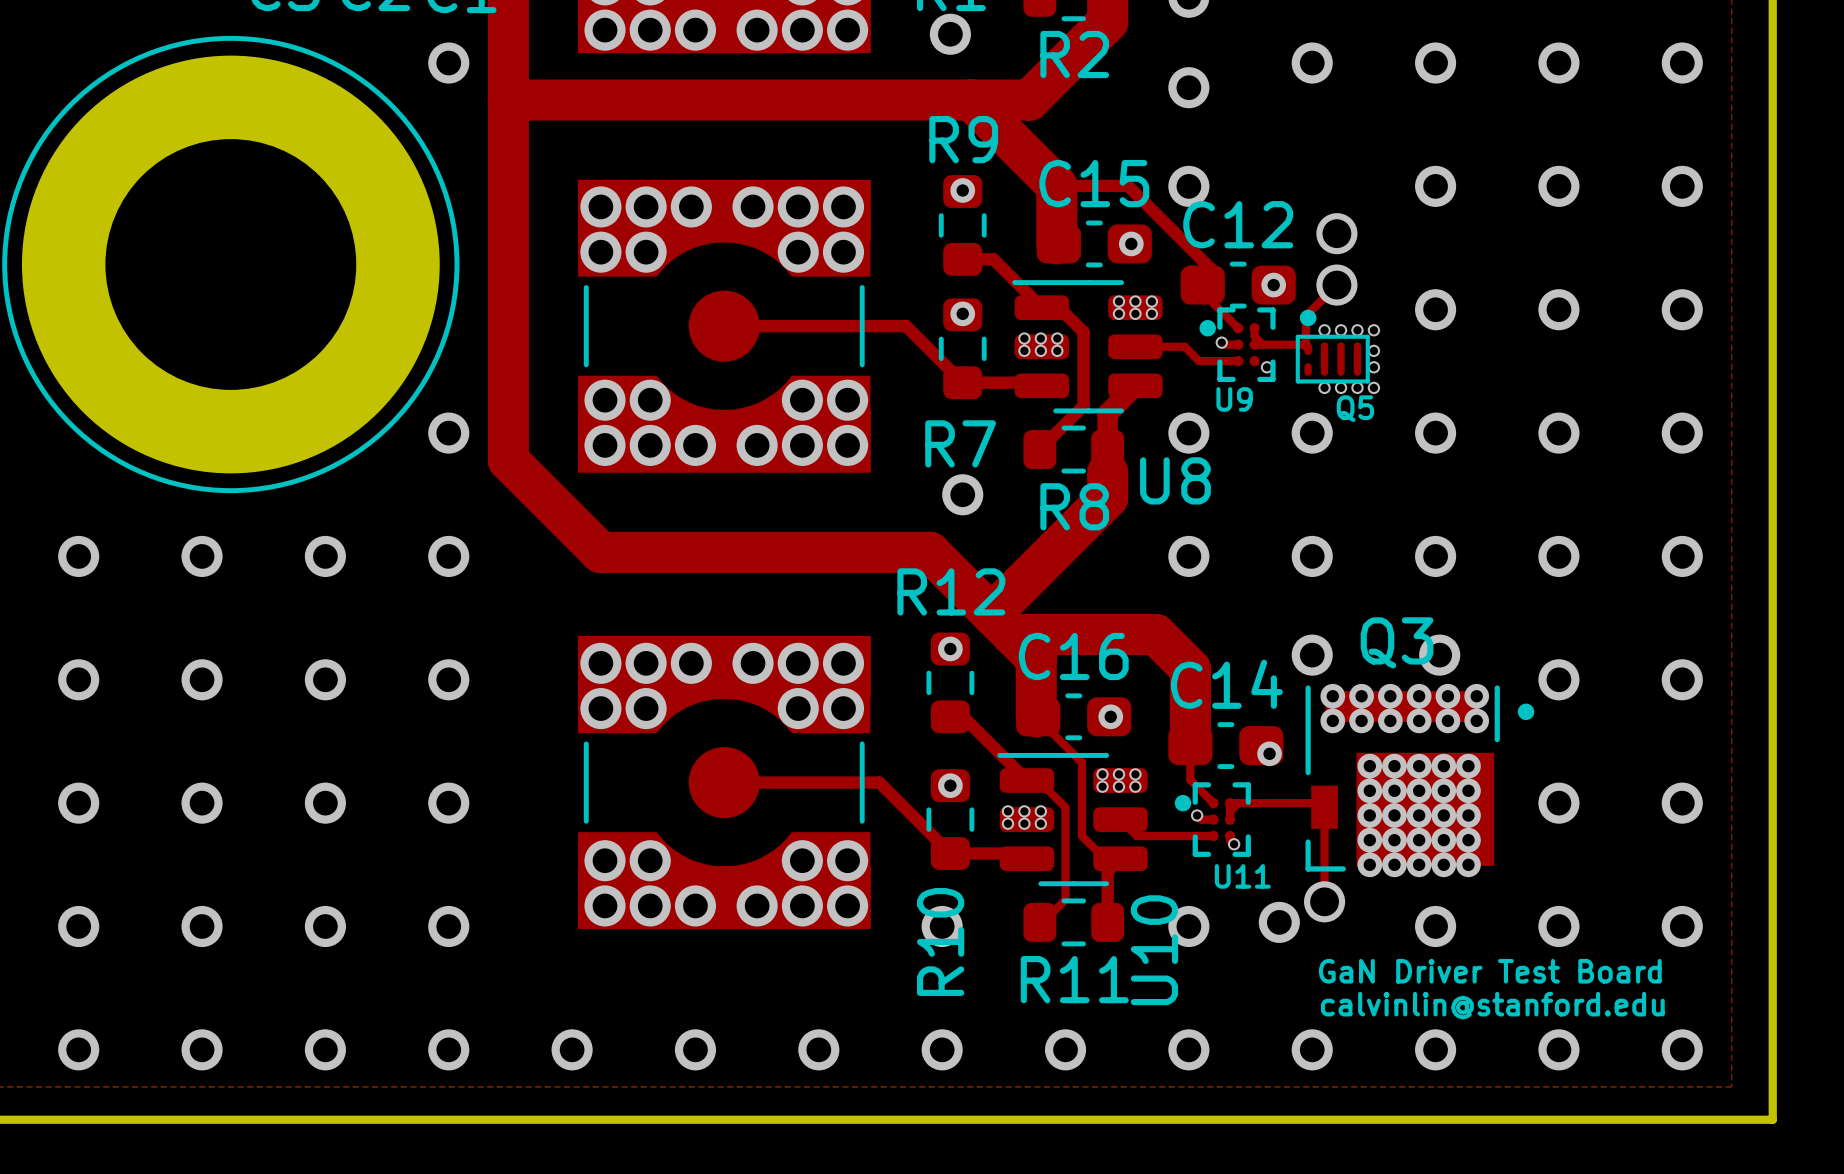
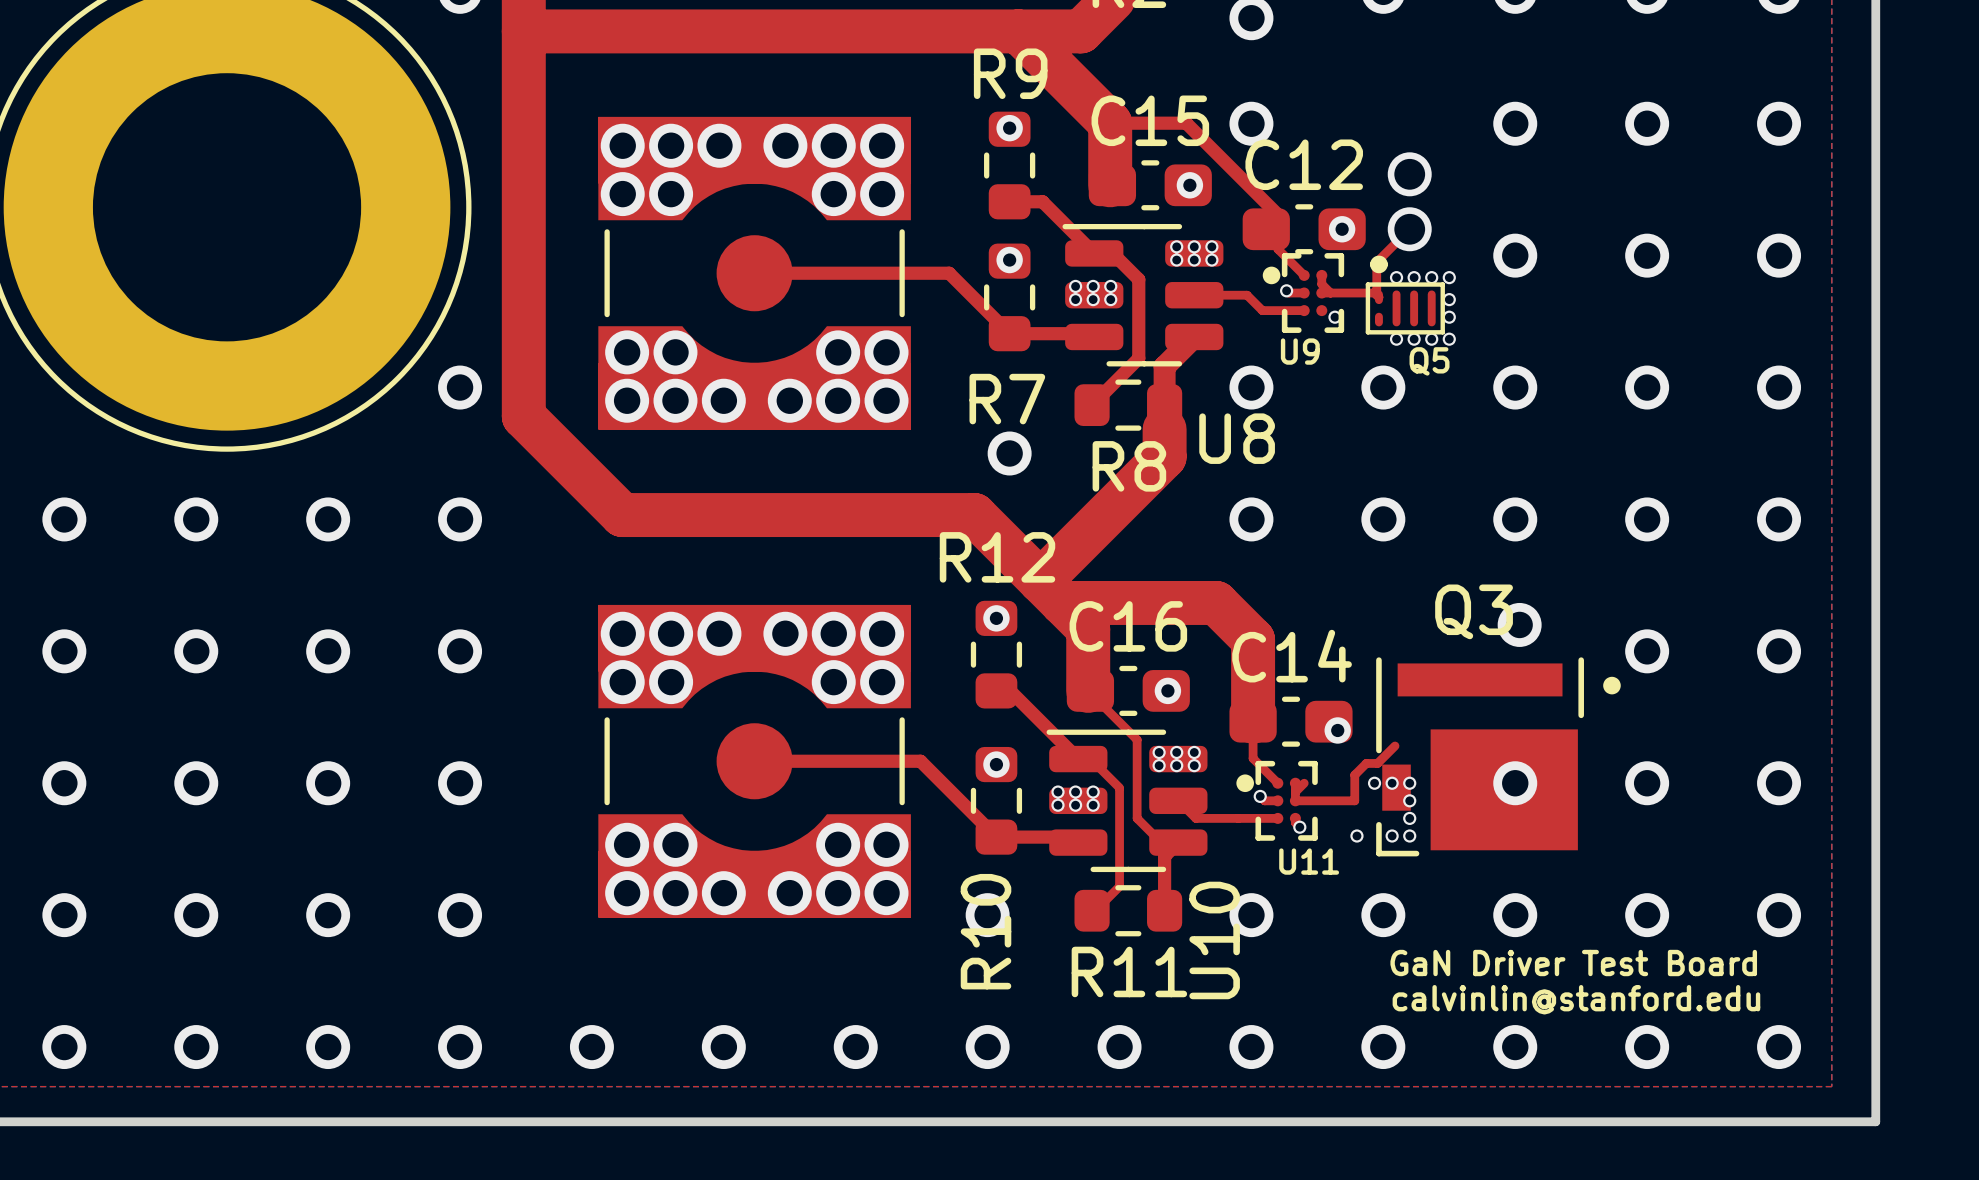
via: (1312, 655) -> none
via: (1332, 696) -> none
via: (1361, 696) -> none
via: (1390, 696) -> none
via: (1419, 696) -> none
via: (1447, 696) -> none
via: (1476, 696) -> none
via: (1332, 720) -> none
via: (1361, 720) -> none
via: (1390, 720) -> none
via: (1419, 720) -> none
via: (1447, 720) -> none
via: (1476, 720) -> none
via: (1369, 766) -> none
via: (1394, 766) -> none
via: (1419, 766) -> none
via: (1443, 766) -> none
via: (1468, 766) -> none
top track: none -> (1395, 746) (1377, 763) (1366, 763) (1354, 775) (1354, 800) (1295, 800)
via: (1369, 790) -> none
via: (1394, 790) -> none
via: (1419, 790) -> none
via: (1443, 790) -> none
via: (1468, 790) -> none
top track: (1230, 803) (1320, 803) (1324, 807) (1324, 901) -> none
via: none -> (1374, 783)
via: none -> (1392, 783)
via: none -> (1409, 783)
via: none -> (1515, 783)
via: (1369, 815) -> none
via: (1394, 815) -> none
via: (1419, 815) -> none
via: (1443, 815) -> none
via: (1468, 815) -> none
via: none -> (1409, 800)
via: none -> (1409, 818)
via: (1369, 840) -> none
via: (1394, 840) -> none
via: (1419, 840) -> none
via: (1443, 840) -> none
via: (1468, 840) -> none
via: none -> (1356, 836)
via: none -> (1392, 836)
via: none -> (1409, 836)
via: (1369, 864) -> none
via: (1394, 864) -> none
via: (1419, 864) -> none
via: (1443, 864) -> none
via: (1468, 864) -> none
via: (1324, 901) -> none
via position: (1279, 922) -> (1383, 915)

